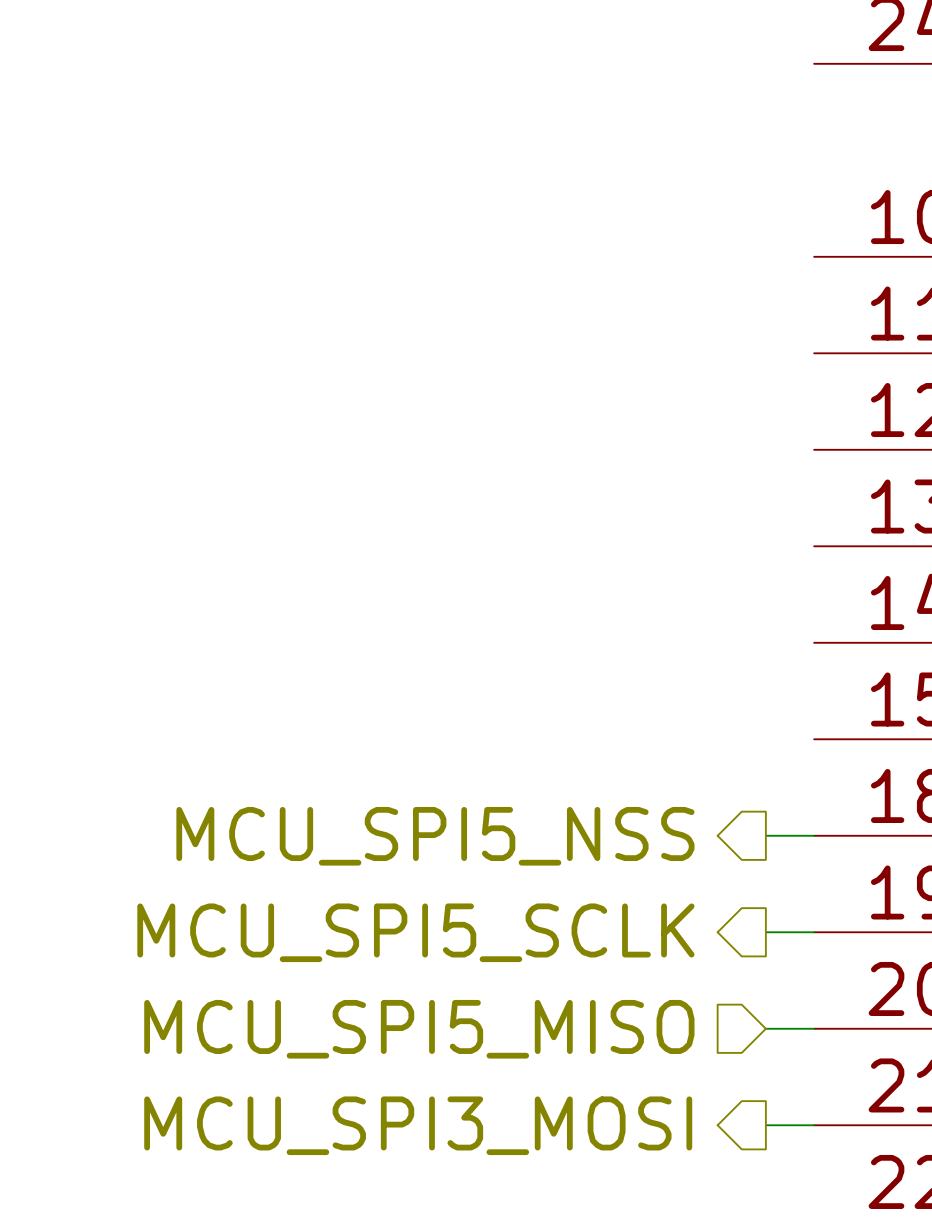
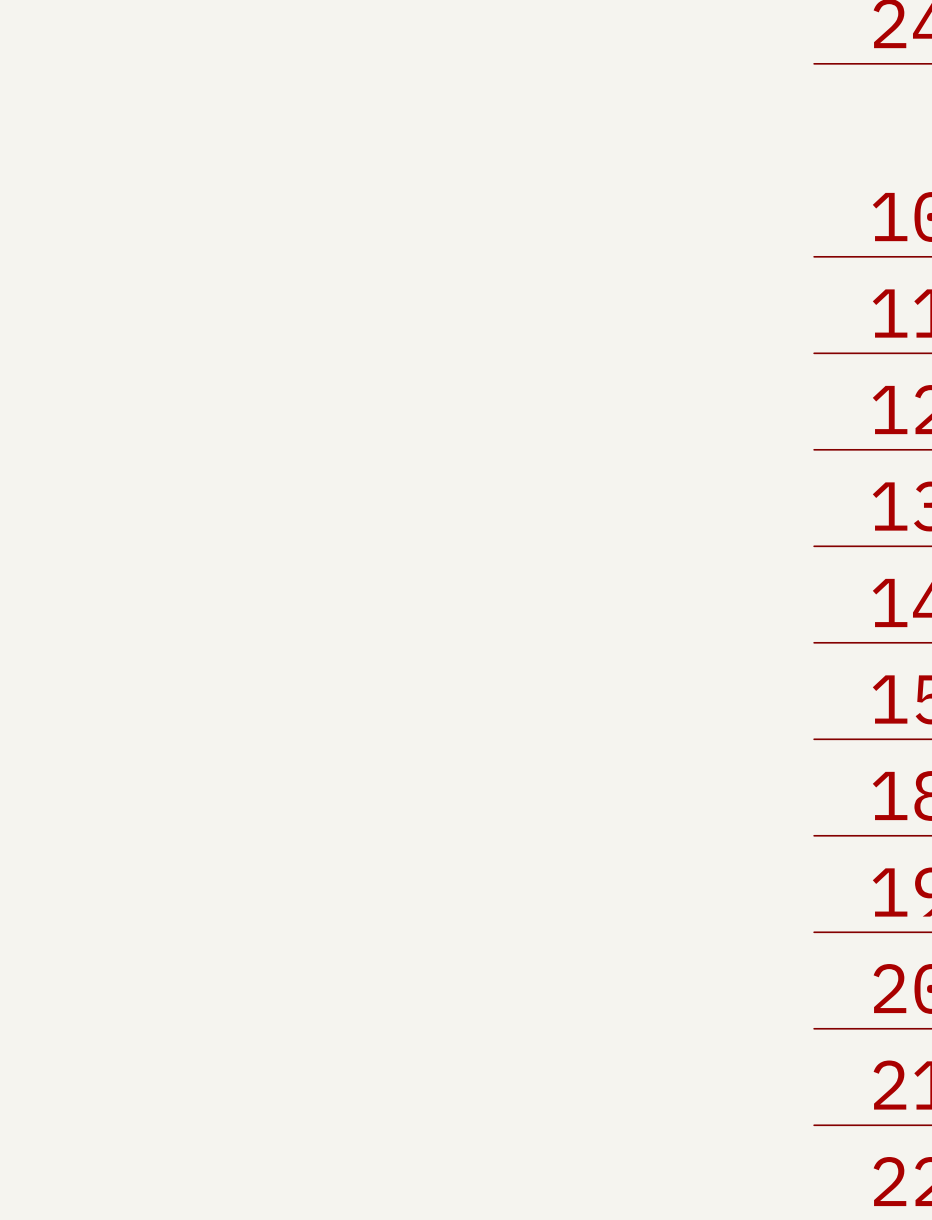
wire: (765, 835) (814, 835) -> none
hierarchical label: MCU_SPI5_NSS (435, 836) -> none
hierarchical label: MCU_SPI5_SCLK (415, 932) -> none
wire: (765, 932) (814, 932) -> none
wire: (765, 1028) (814, 1028) -> none
hierarchical label: MCU_SPI5_MISO (419, 1029) -> none
hierarchical label: MCU_SPI3_MOSI (418, 1125) -> none
wire: (765, 1125) (814, 1125) -> none

